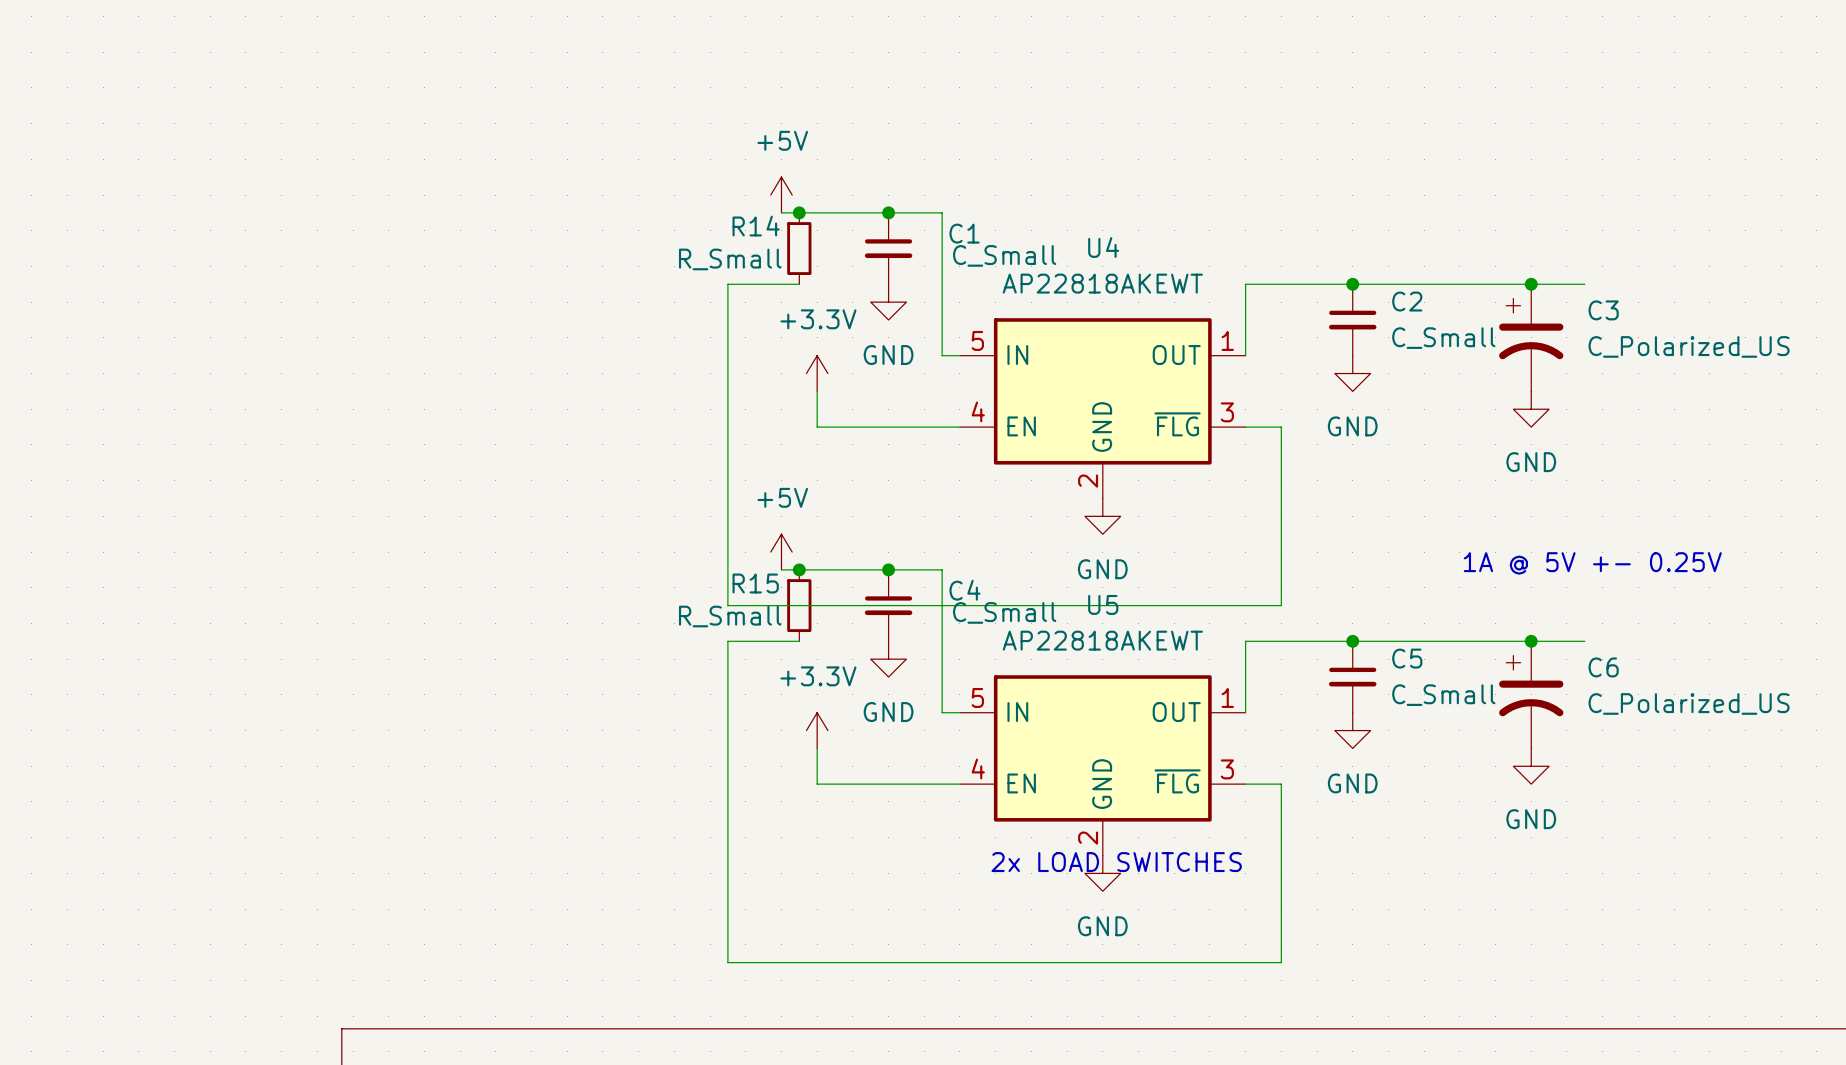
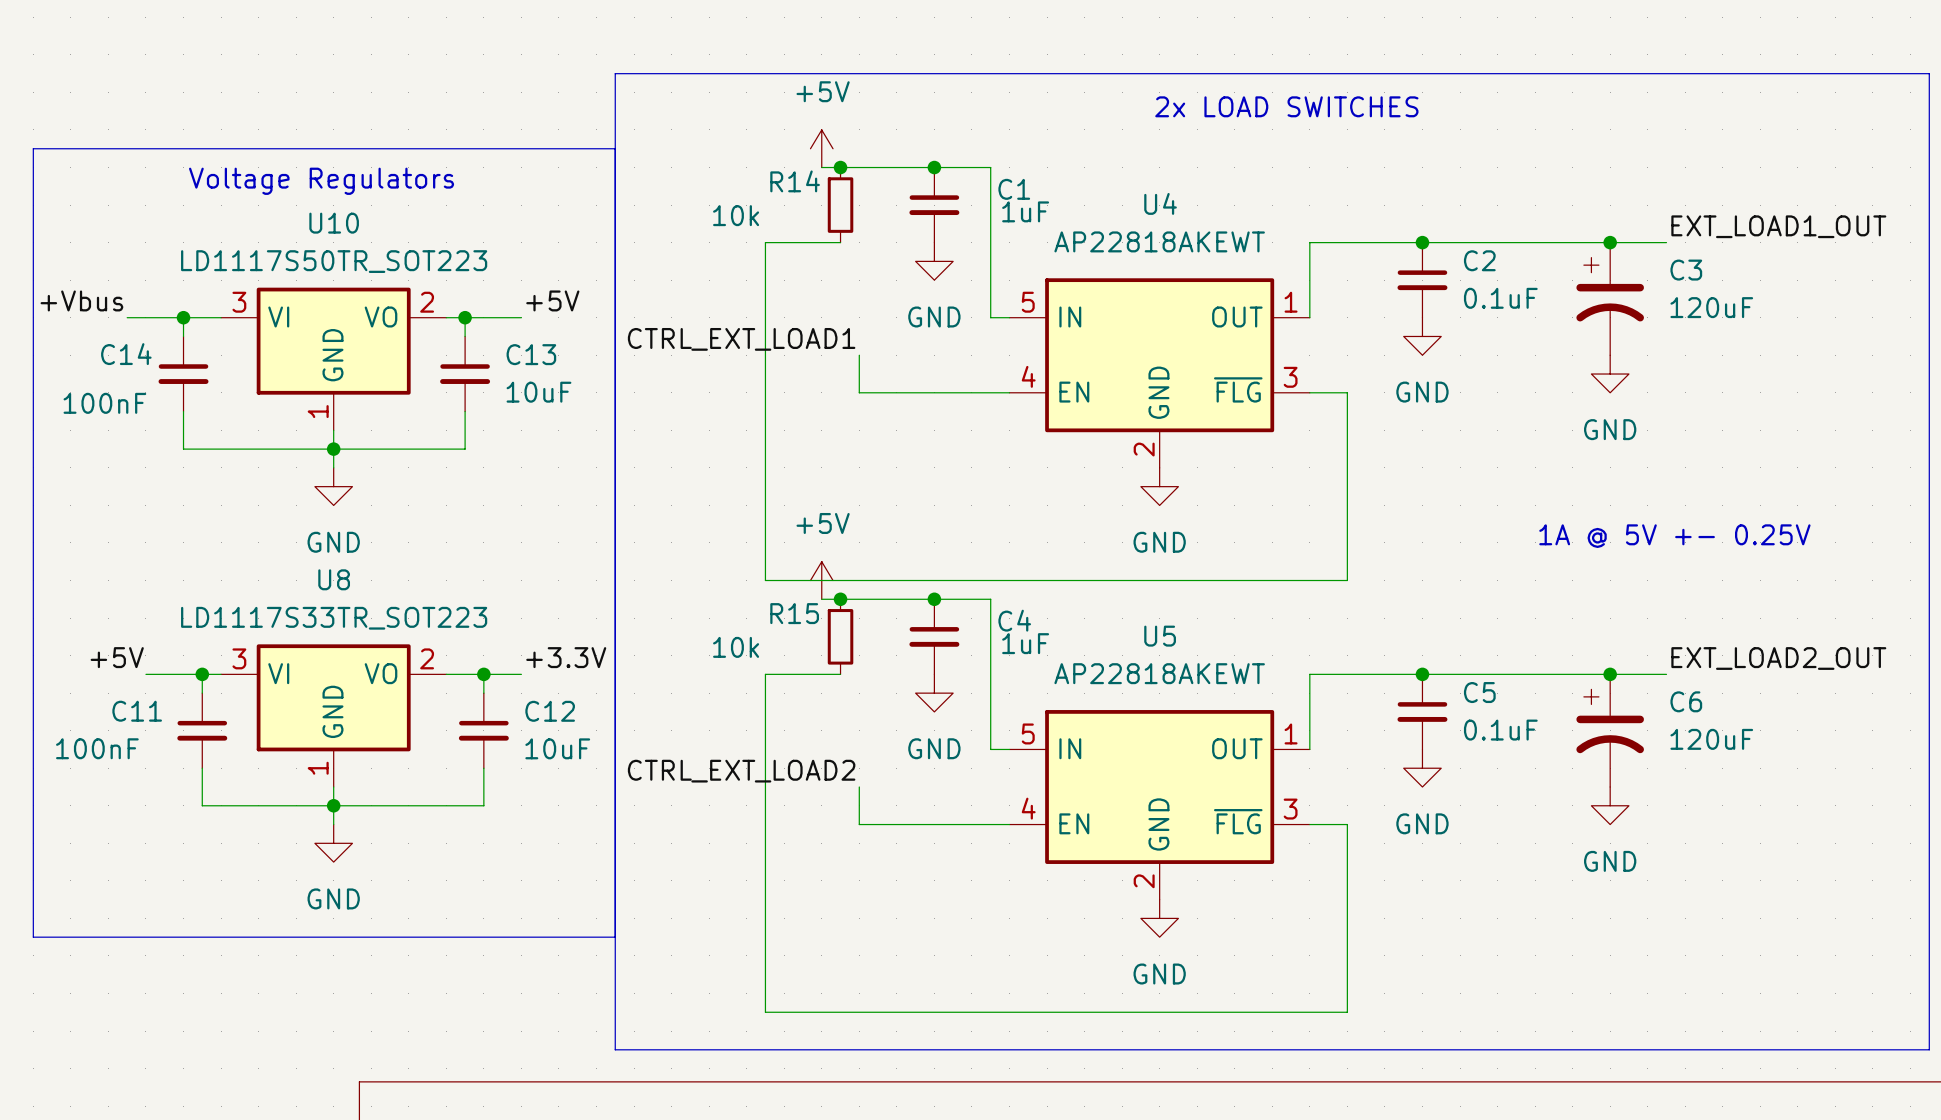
line: none -> (615, 73) (1929, 73) (1929, 1049) (615, 1049) (615, 73)
text: none -> 2x LOAD SWITCHES (1286, 106)
line: none -> (615, 148) (33, 148) (33, 937) (615, 937)
junction: none -> (840, 167)
junction: none -> (934, 167)
text: none -> Voltage Regulators (321, 181)
power symbol position: +5V (781, 195) -> +5V (821, 148)
wire: (781, 212) (942, 212) -> (821, 167) (990, 167) (990, 223)
junction: (799, 212) -> none
junction: (888, 212) -> none
label: none -> EXT_LOAD1_OUT (1778, 226)
R14 position: (799, 248) -> (840, 205)
C1 position: (888, 248) -> (934, 205)
C1 value: C_Small (1004, 255) -> 1uF (1025, 211)
R14 value: R_Small (730, 259) -> 10k (736, 215)
wire: (727, 284) (799, 284) -> (765, 298) (765, 242) (840, 242)
wire: (1245, 284) (1584, 284) -> (1309, 298) (1309, 242) (1666, 242)
junction position: (1352, 284) -> (1422, 242)
junction position: (1531, 284) -> (1610, 242)
label: none -> +Vbus (81, 300)
label: none -> +5V (552, 300)
wire: none -> (127, 317) (221, 317)
wire: none -> (183, 317) (183, 336)
junction: none -> (183, 317)
wire: none -> (446, 317) (521, 317)
wire: none -> (465, 317) (465, 336)
junction: none -> (465, 317)
power symbol position: GND (888, 302) -> GND (934, 261)
wire: (942, 302) (942, 355) (959, 355) -> (990, 317) (1009, 317)
wire: (1245, 302) (1245, 355) -> none
C2 position: (1352, 319) -> (1422, 280)
label: none -> CTRL_EXT_LOAD1 (741, 339)
C3 position: (1531, 337) -> (1610, 298)
C2 value: C_Small (1443, 338) -> 0.1uF (1500, 298)
U10: none -> LD1117S50TR_SOT223 (333, 359)
C3 value: C_Polarized_US (1689, 346) -> 120uF (1711, 307)
C14: none -> 100nF (183, 374)
C13: none -> 10uF (465, 374)
power symbol: +3.3V (817, 373) -> none
power symbol position: GND (1352, 373) -> GND (1422, 336)
wire: none -> (183, 411) (183, 449) (465, 449) (465, 411)
wire: (817, 391) (817, 427) (959, 427) -> (859, 355) (859, 392) (1009, 392)
U4 position: (1102, 408) -> (1159, 373)
wire: none -> (333, 430) (333, 467)
power symbol position: GND (1531, 409) -> GND (1610, 374)
junction: none -> (333, 449)
wire: (1245, 427) (1281, 427) -> (1309, 392) (1347, 392) (1347, 449)
power symbol: none -> GND (333, 486)
power symbol position: GND (1102, 516) -> GND (1159, 486)
wire: (727, 552) (727, 605) (1281, 605) (1281, 552) -> (765, 580) (1347, 580)
text position: 1A @ 5V +- 0.25V (1592, 563) -> 1A @ 5V +- 0.25V (1674, 536)
C4 value: C_Small (1004, 612) -> 1uF (1025, 643)
R15 value: R_Small (730, 616) -> 10k (736, 647)
label: none -> +5V (117, 657)
label: none -> +3.3V (566, 657)
label: none -> EXT_LOAD2_OUT (1778, 658)
wire: none -> (145, 674) (221, 674)
wire: none -> (202, 674) (202, 693)
junction: none -> (202, 674)
wire: none -> (446, 674) (521, 674)
wire: none -> (483, 674) (483, 693)
junction: none -> (483, 674)
U8: none -> LD1117S33TR_SOT223 (333, 715)
C11: none -> 100nF (202, 730)
C12: none -> 10uF (483, 730)
C5 value: C_Small (1443, 695) -> 0.1uF (1500, 730)
C6 value: C_Polarized_US (1689, 703) -> 120uF (1711, 739)
wire: none -> (202, 768) (202, 805) (483, 805) (483, 768)
power symbol: +3.3V (817, 730) -> none
label: none -> CTRL_EXT_LOAD2 (741, 771)
wire: none -> (333, 787) (333, 824)
junction: none -> (333, 805)
power symbol: none -> GND (333, 843)
text: 2x LOAD SWITCHES (1116, 862) -> none

